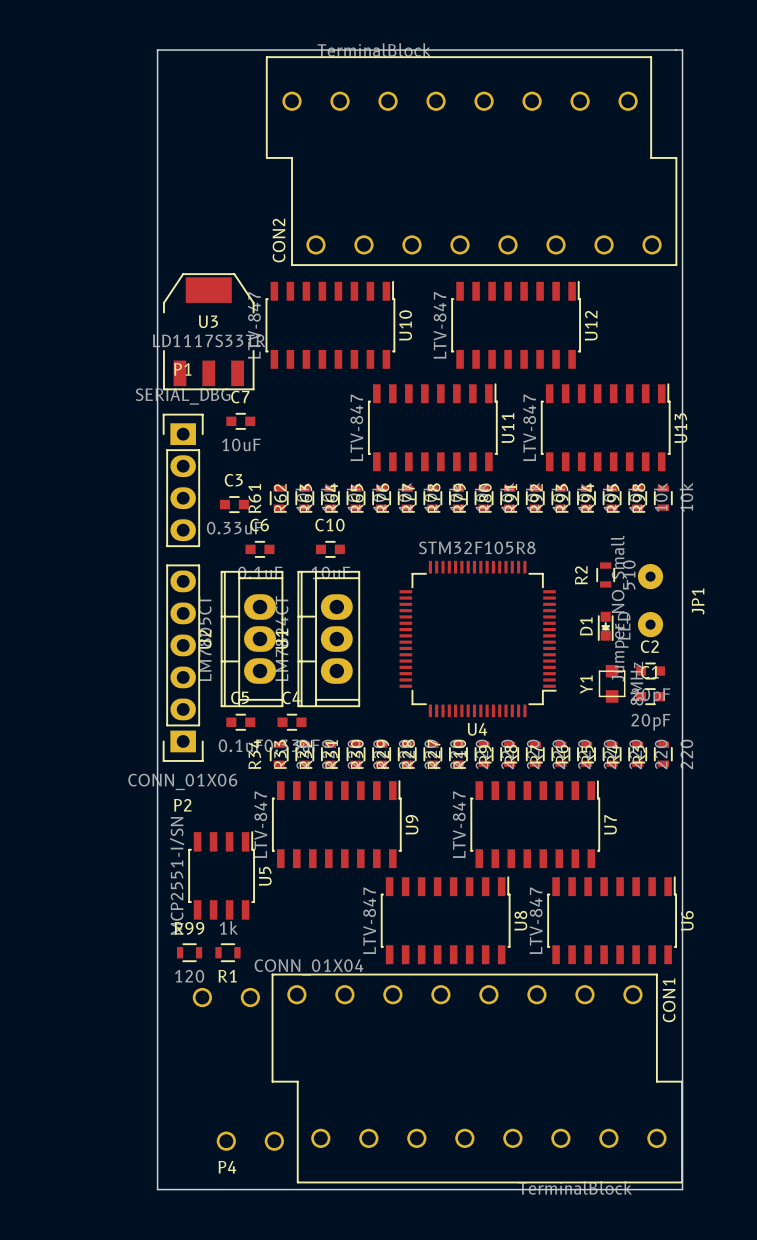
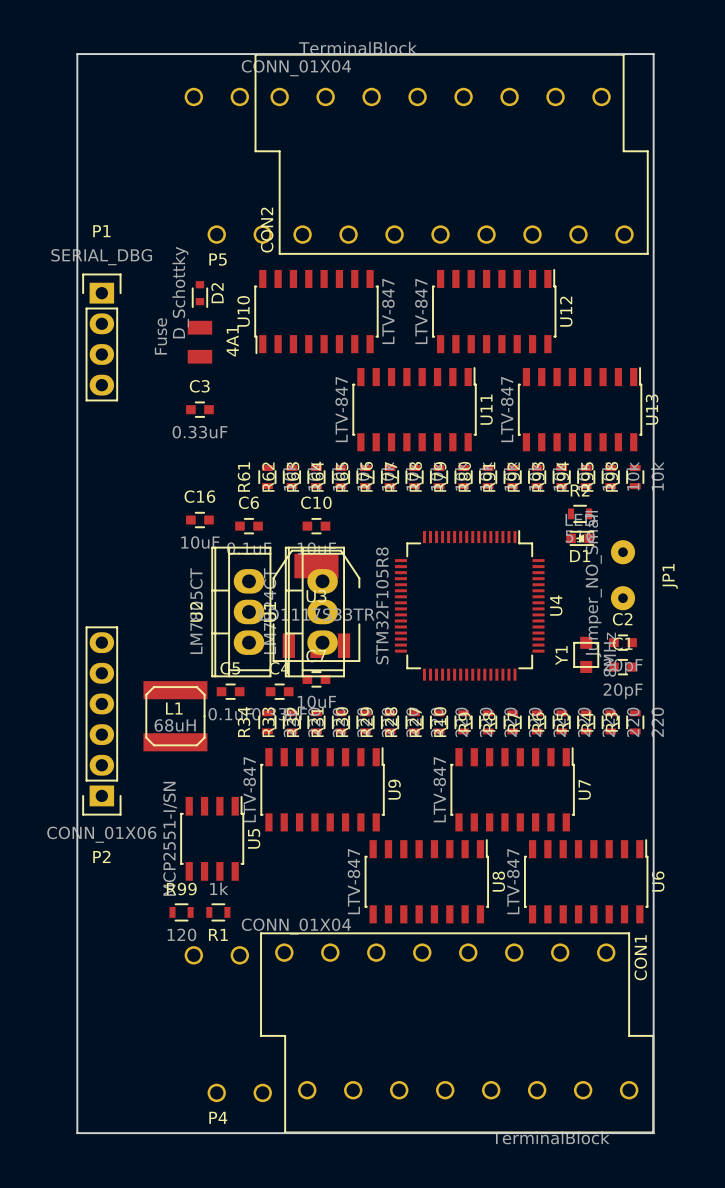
board edge: (682, 56) (682, 50) (157, 50) (157, 1189) (682, 1189) (682, 1183) -> (653, 54) (77, 54) (77, 1133) (653, 1133)
P5: none -> CONN_01X04 (228, 165)
D2: none -> D_Schottky (199, 294)
U10 rotation: 0° (330, 324) -> 180° (316, 312)
U3 position: (208, 331) -> (316, 605)
4A1: none -> Fuse (199, 342)
C7 position: (240, 421) -> (316, 679)
P1 position: (183, 480) -> (101, 337)
C3 position: (234, 504) -> (199, 409)
C16: none -> 10uF (199, 520)
R2 rotation: 0° (605, 574) -> 90° clockwise (580, 513)
R2 position: (605, 574) -> (580, 513)
D1 rotation: 0° (605, 626) -> 90° counterclockwise (580, 538)
D1 position: (605, 626) -> (580, 538)
U4 rotation: 0° (478, 639) -> 90° counterclockwise (469, 605)
P2 position: (183, 663) -> (101, 720)
L1: none -> 68uH (175, 716)

